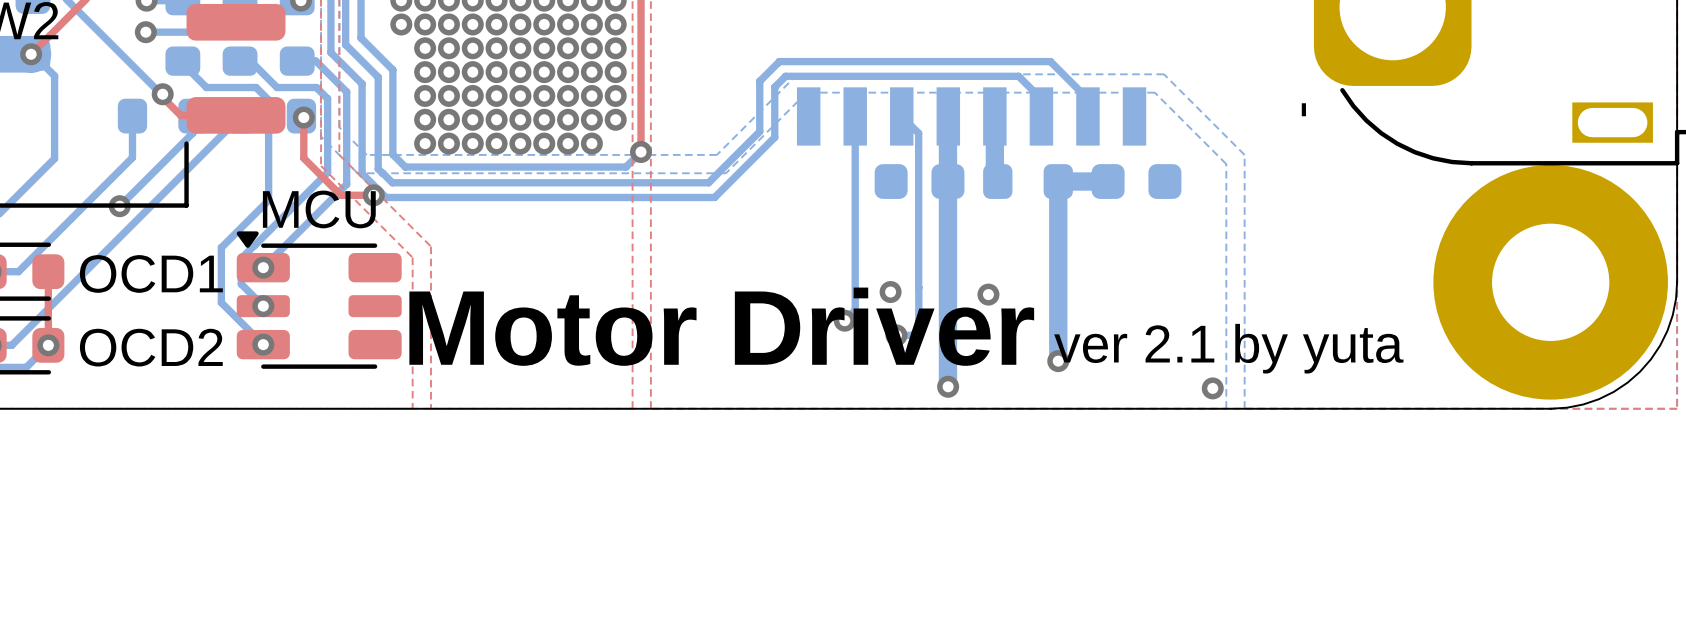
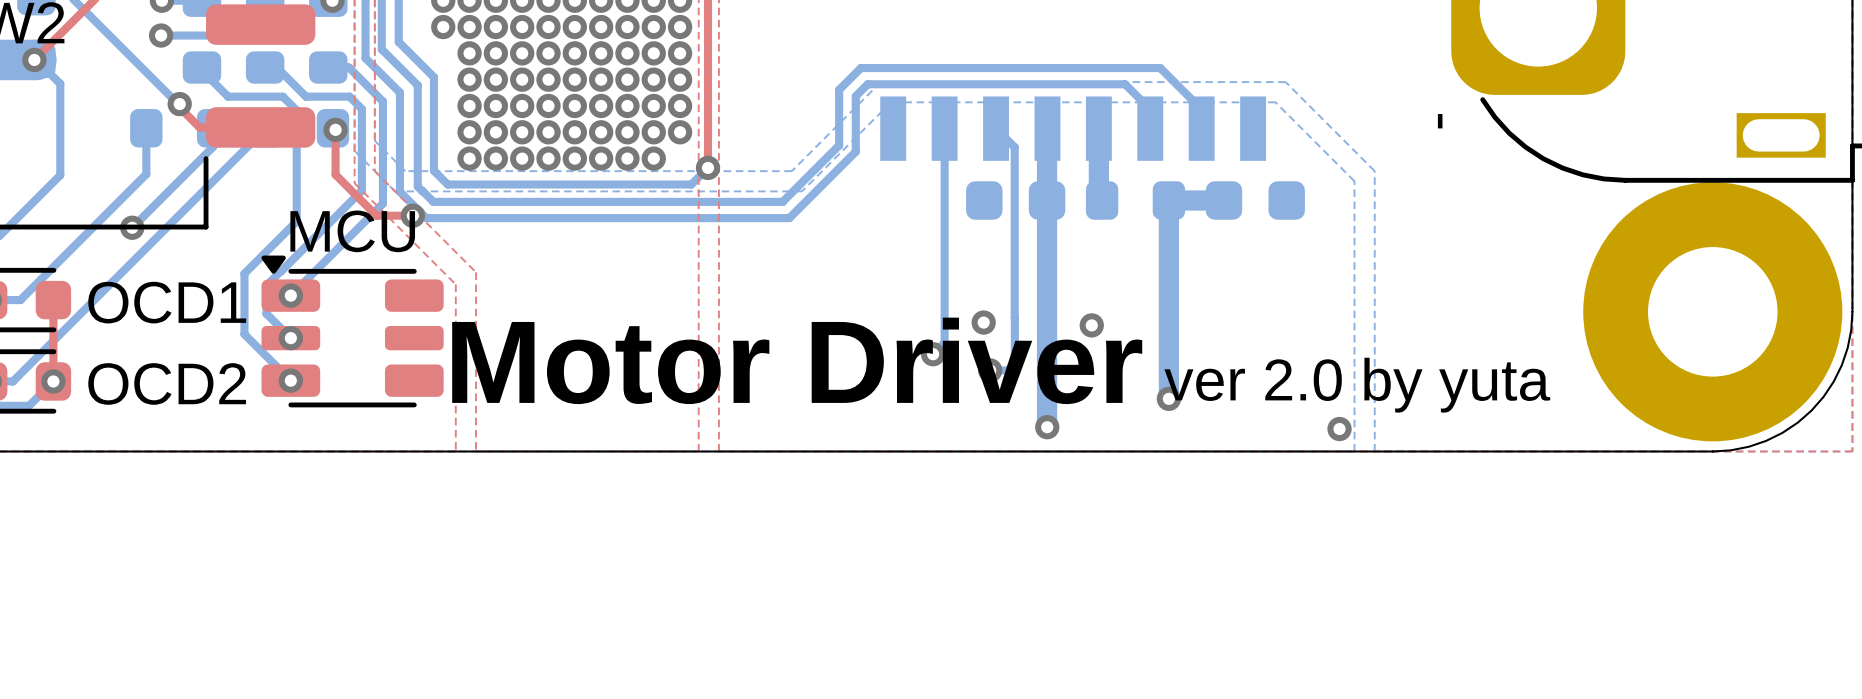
drawing shape: [409, 287, 1404, 374] -> [452, 317, 1551, 413]

